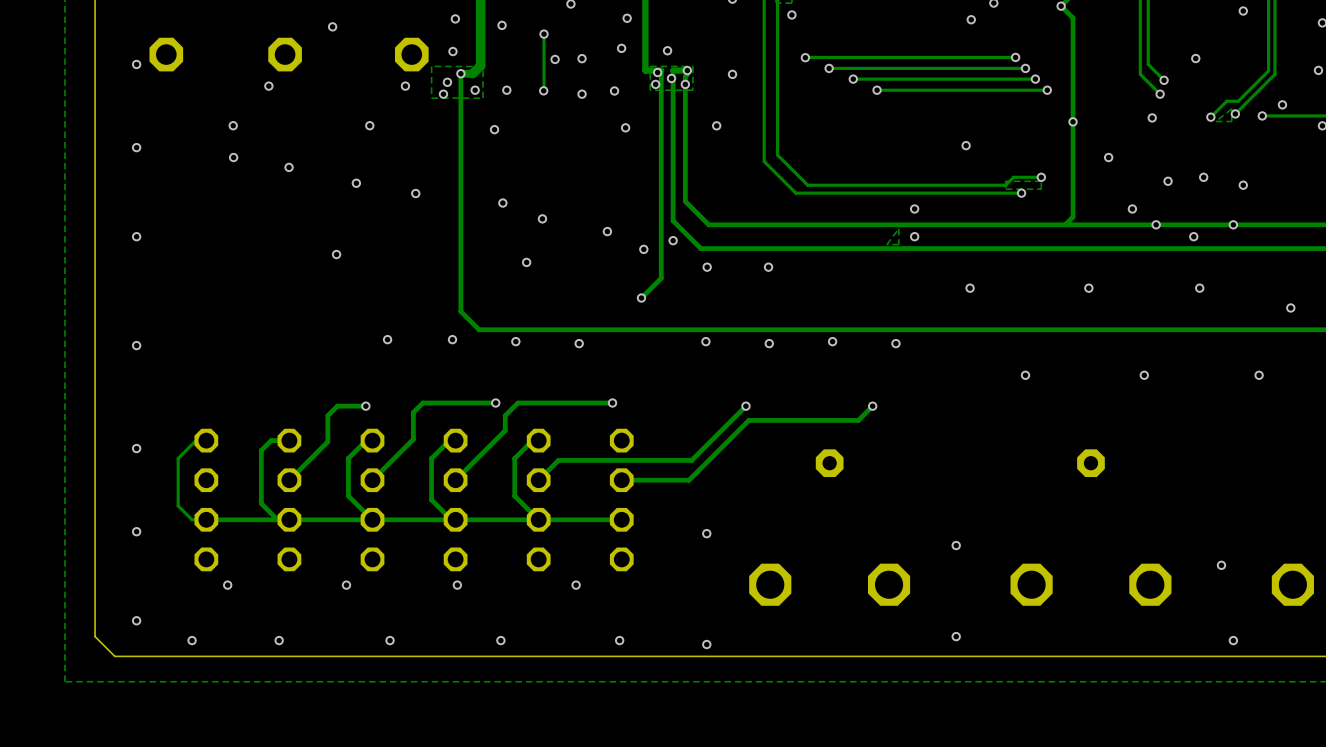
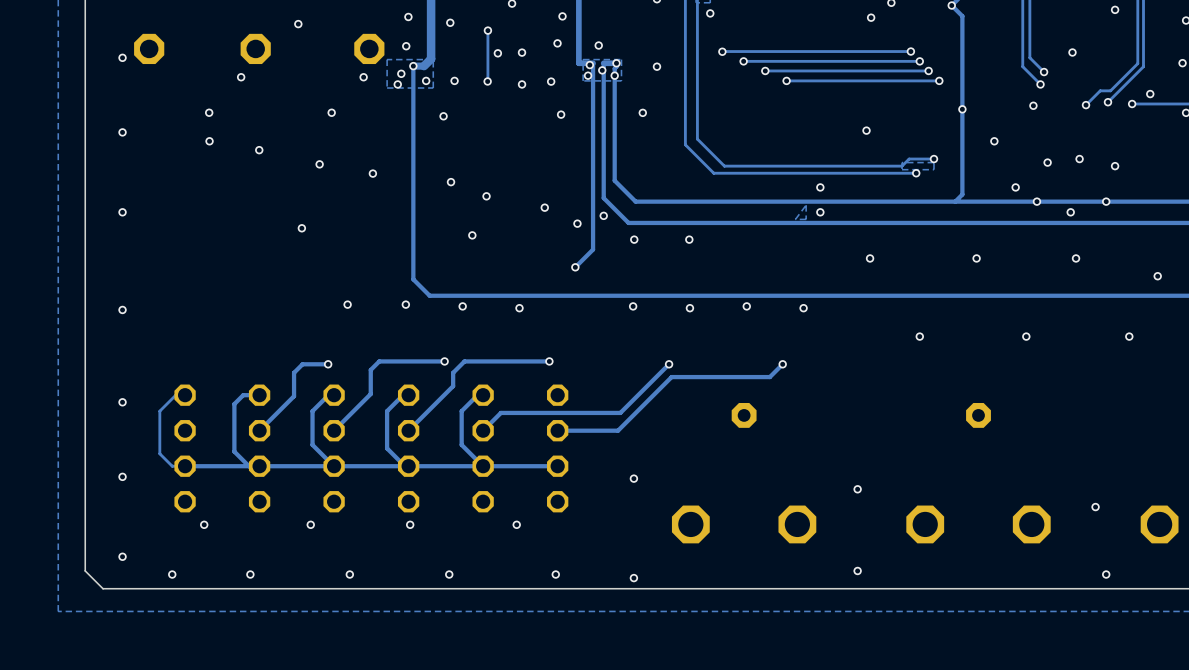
zone outline: (1231, 108) (1231, 121) (1215, 121) (1231, 108) -> none

